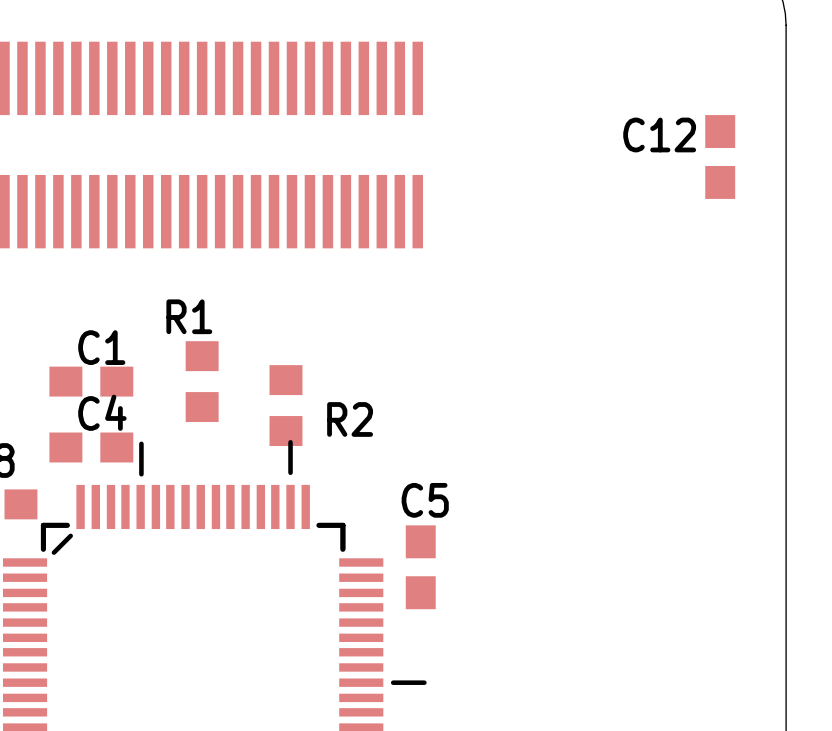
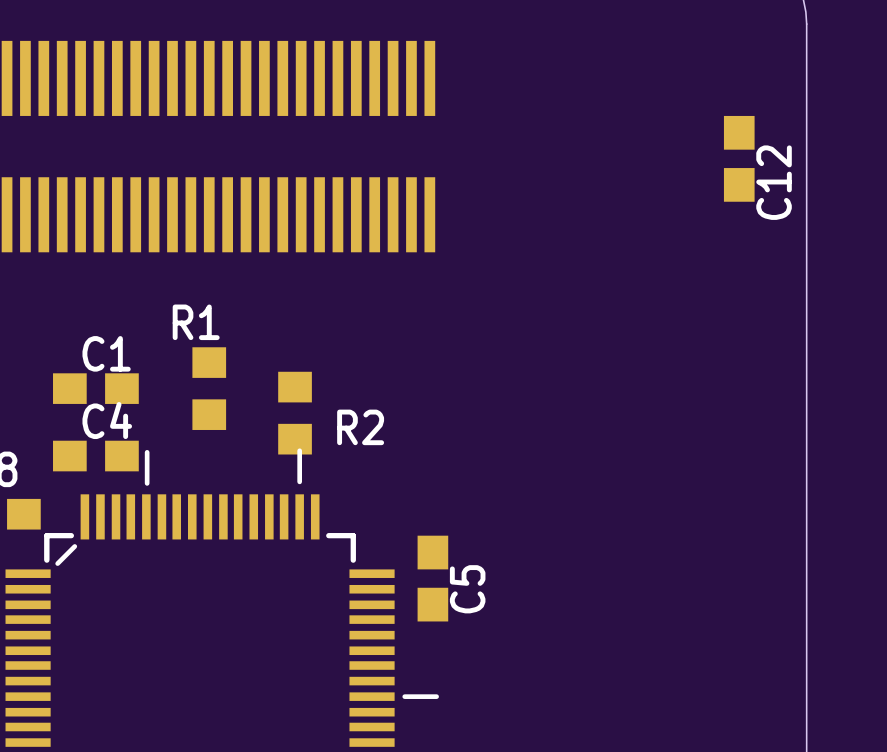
C12 name rotation: 0° (659, 134) -> 90° counterclockwise (774, 182)
C12 name position: C12 (659, 134) -> C12 (774, 182)
C5 name rotation: 0° (425, 500) -> 90° counterclockwise (467, 589)
C5 name position: C5 (425, 500) -> C5 (467, 589)

